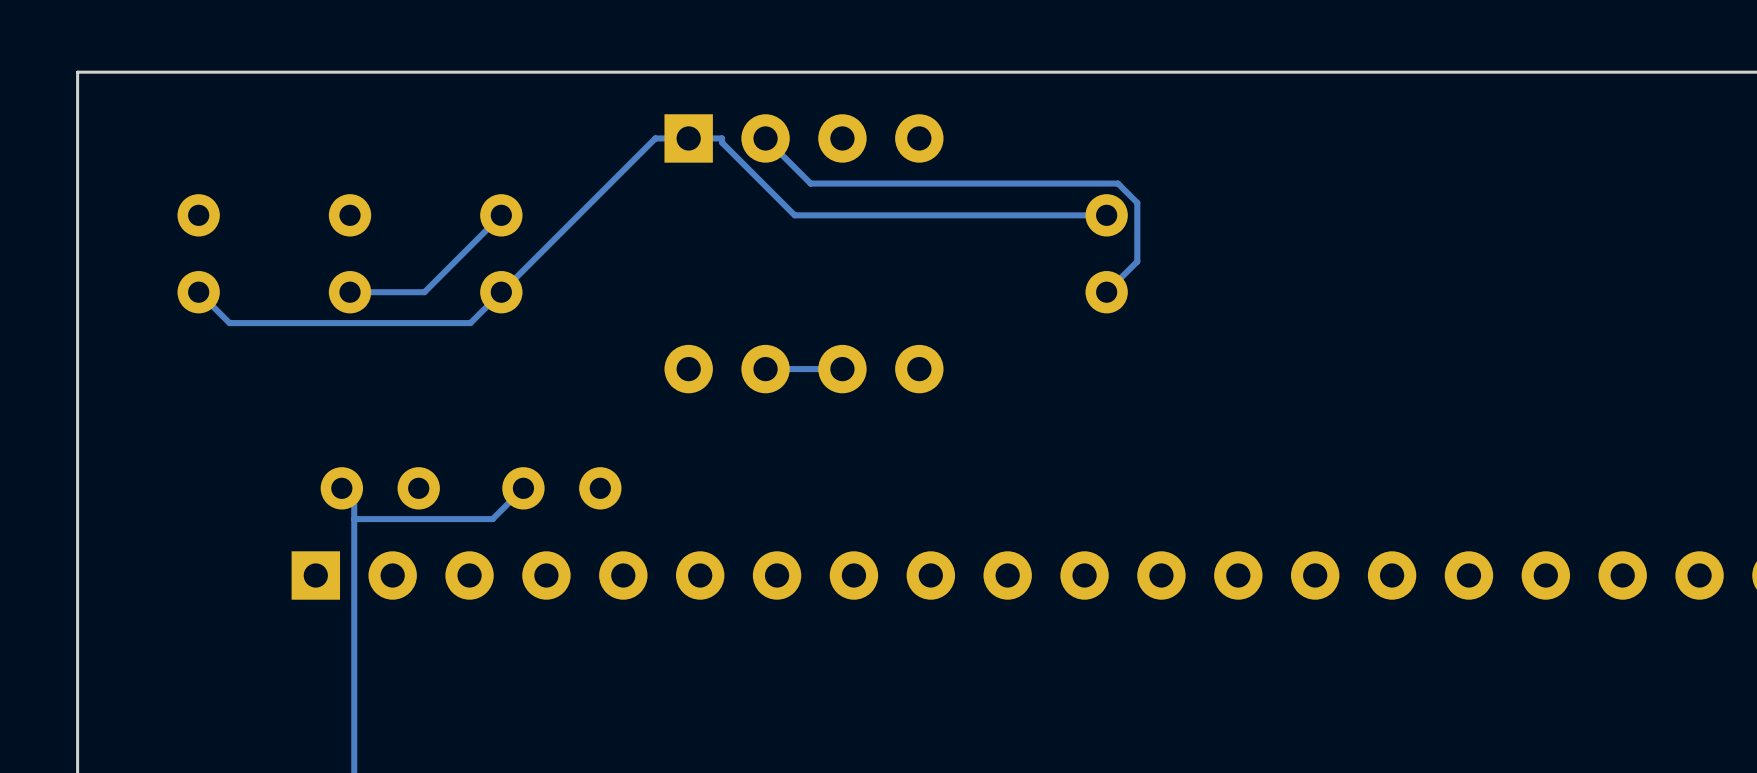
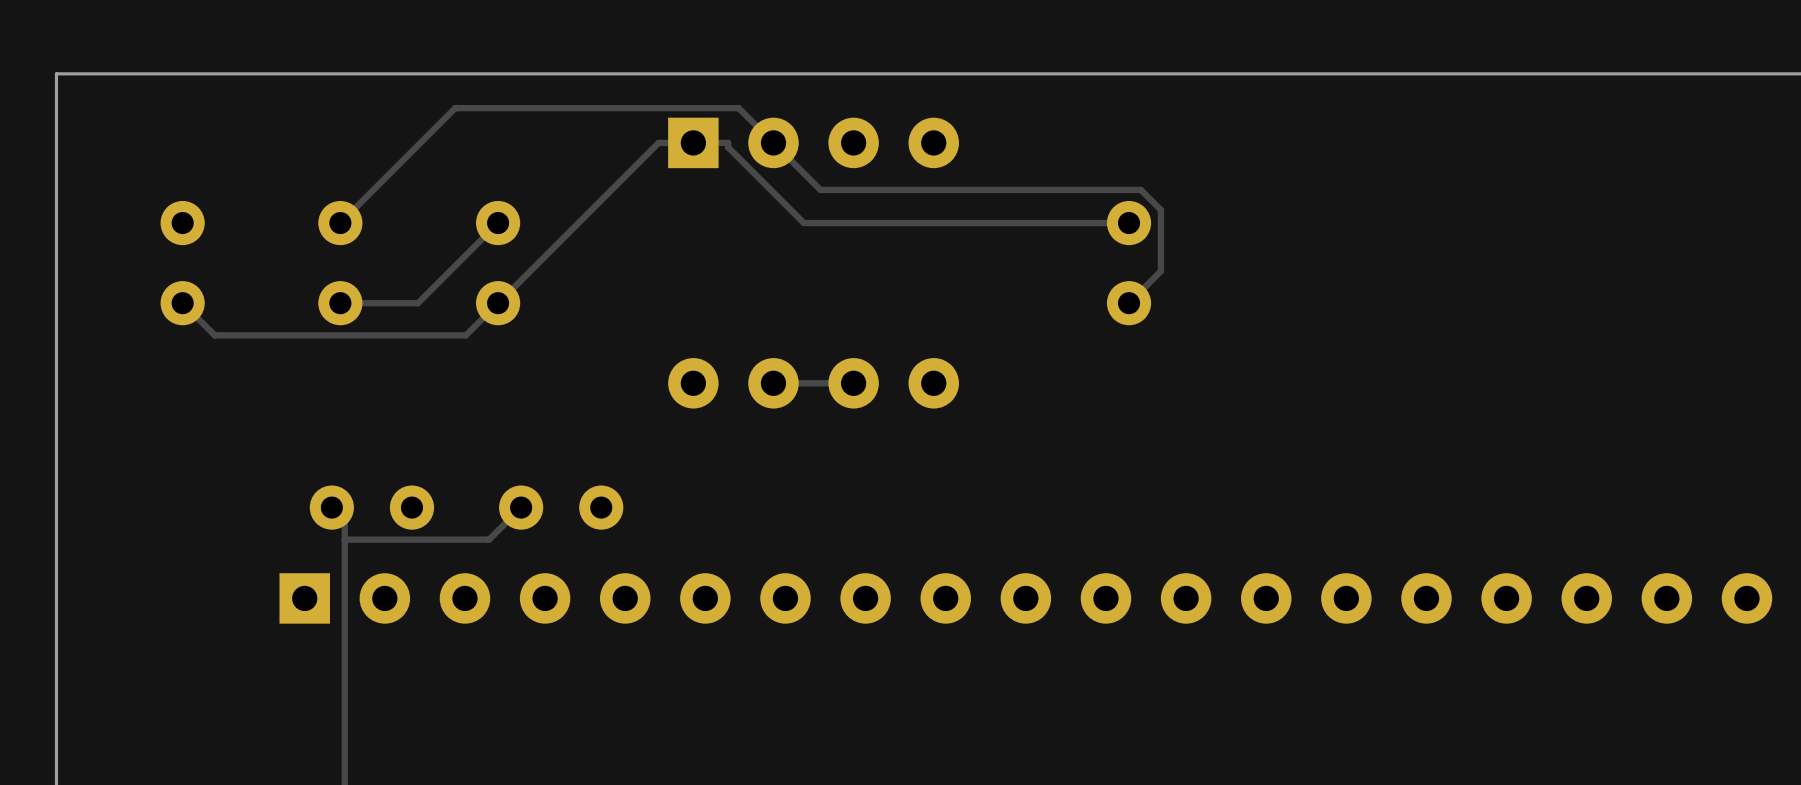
track: none -> (773, 142) (738, 108) (455, 108) (340, 223)

